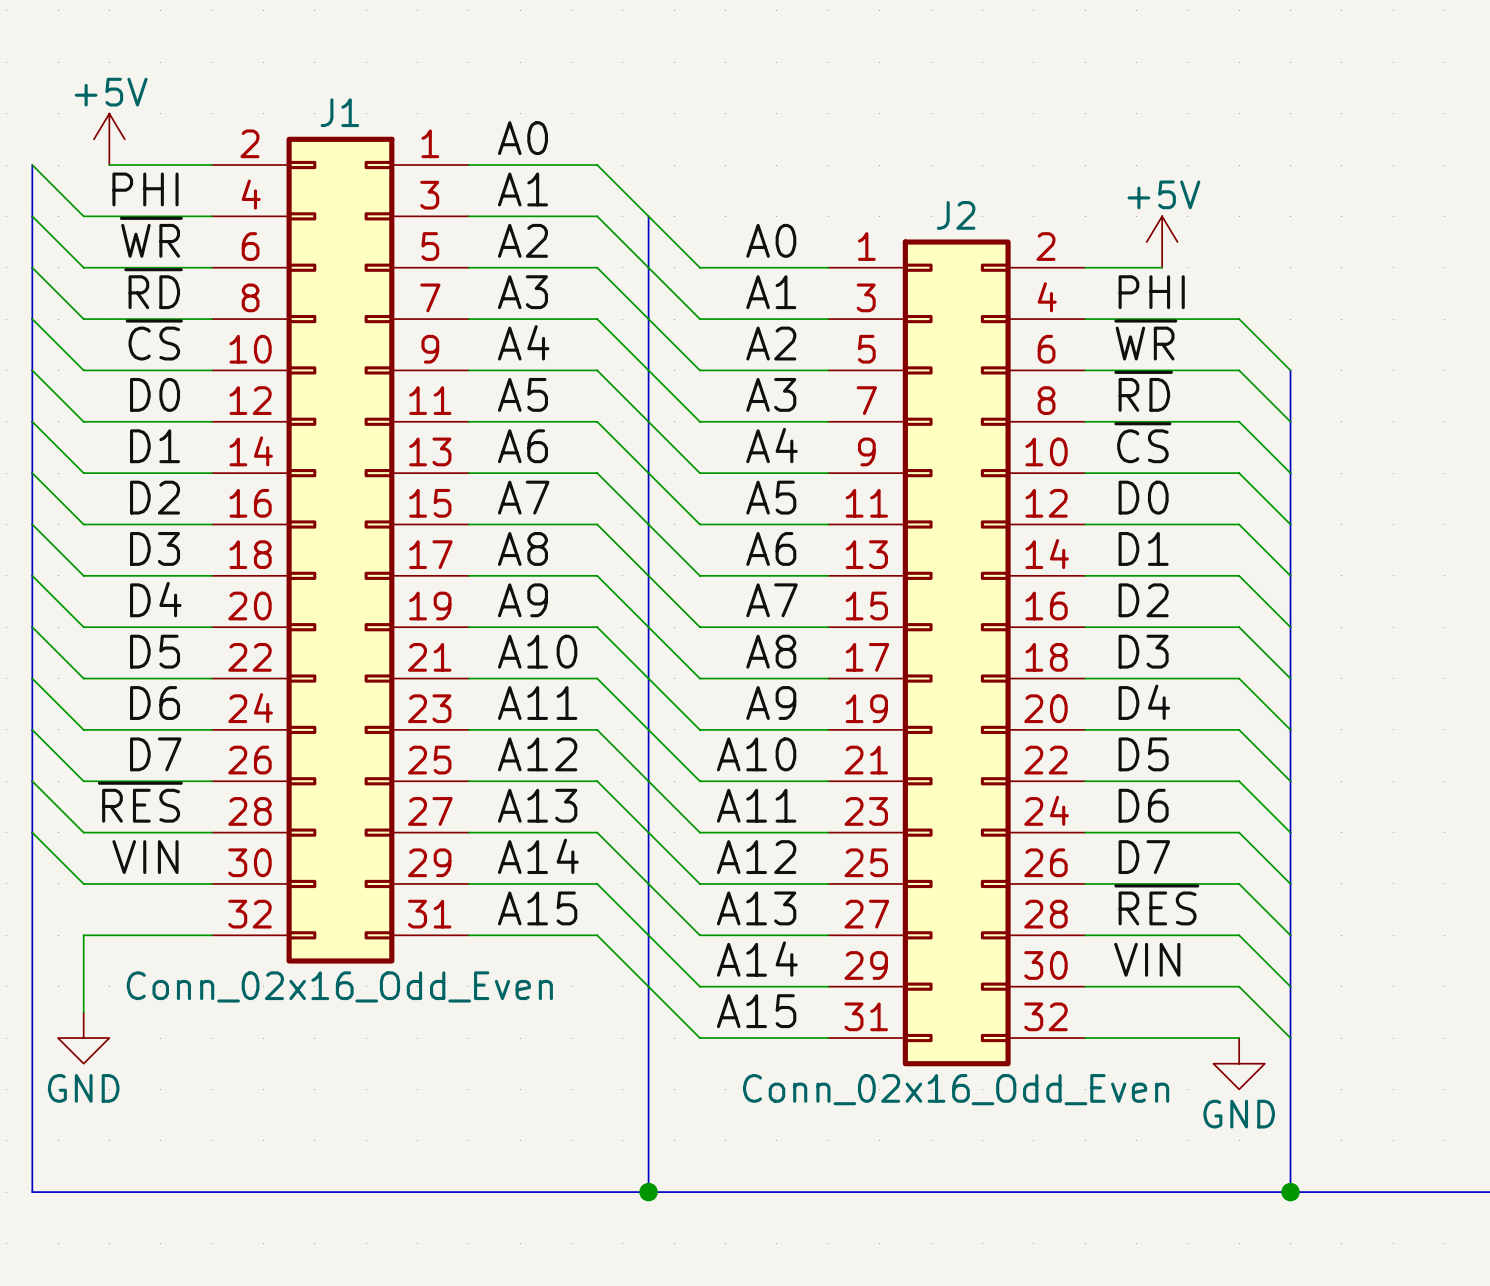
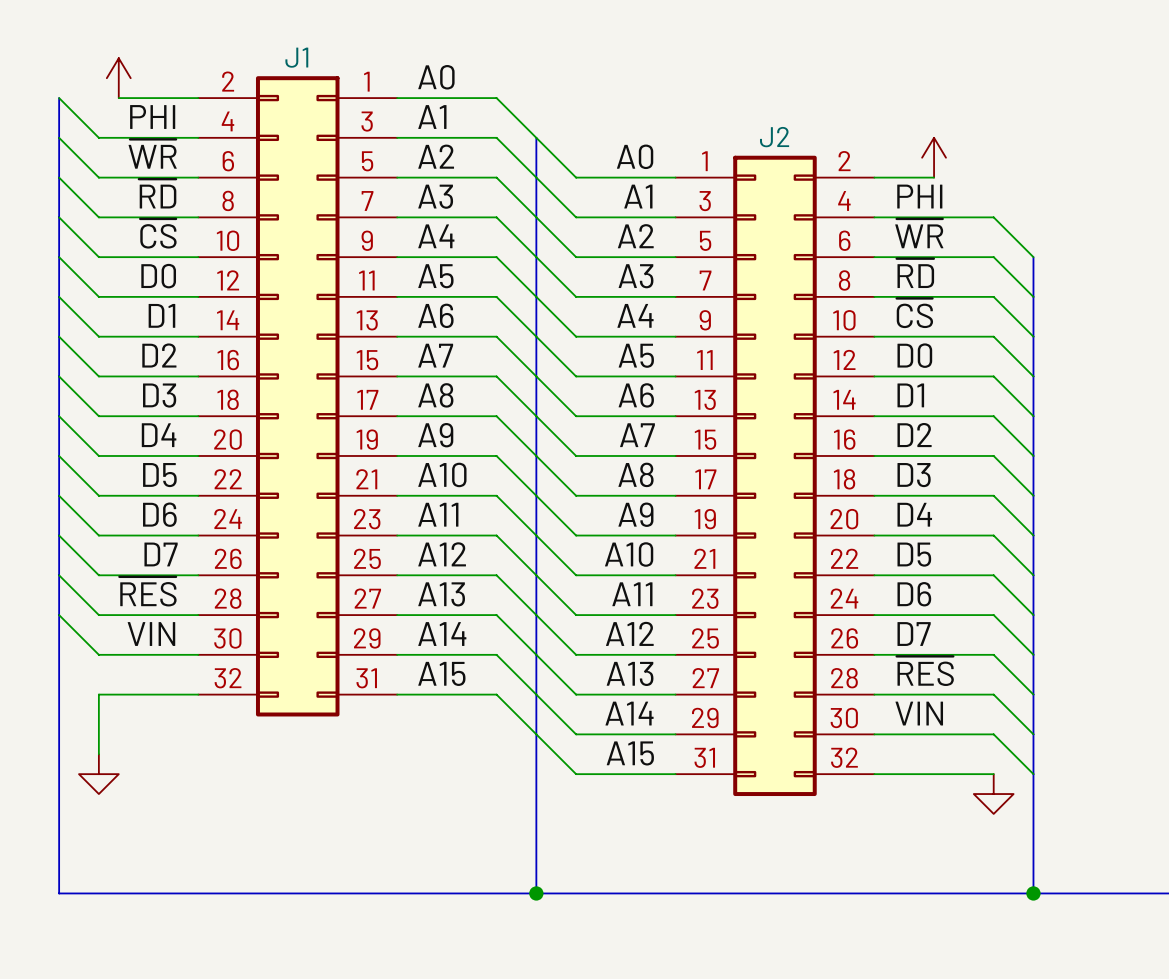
power symbol text: +5V (111, 92) -> none
power symbol text: +5V (1163, 194) -> none
J1 value: Conn_02x16_Odd_Even (339, 986) -> none
power symbol text: GND (83, 1088) -> none
J2 value: Conn_02x16_Odd_Even (956, 1089) -> none
power symbol text: GND (1239, 1114) -> none

